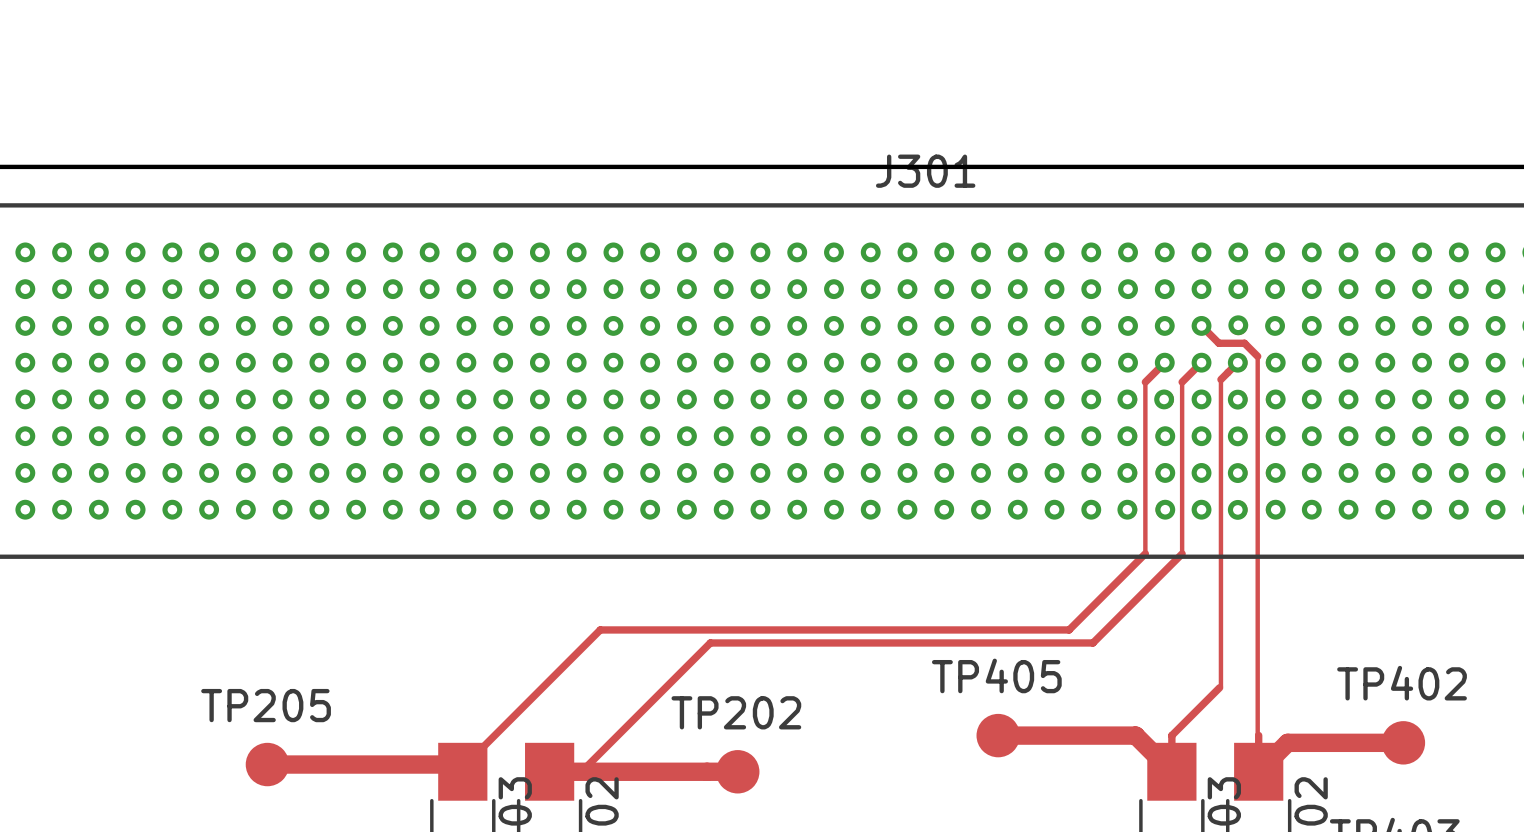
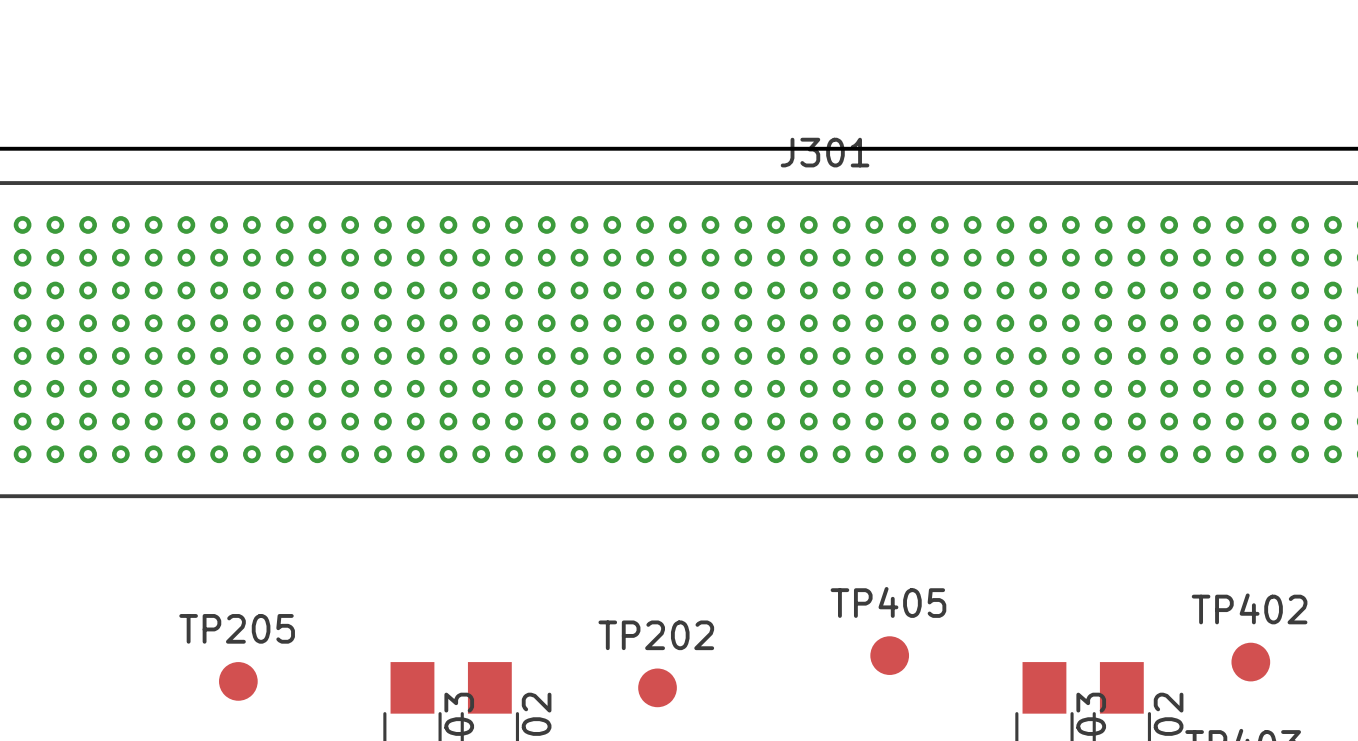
track: (1201, 325) (1218, 343) (1244, 343) (1257, 356) (1258, 771) (1287, 742) (1403, 742) -> none
track: (1164, 362) (1145, 382) (1145, 553) (1069, 629) (600, 629) (462, 767) (462, 771) (455, 764) (267, 764) -> none
track: (1201, 362) (1182, 382) (1182, 553) (1093, 642) (710, 642) (581, 771) (549, 771) (737, 771) -> none
track: (1237, 362) (1220, 379) (1220, 686) (1171, 735) (1171, 771) (1135, 735) (998, 735) -> none

